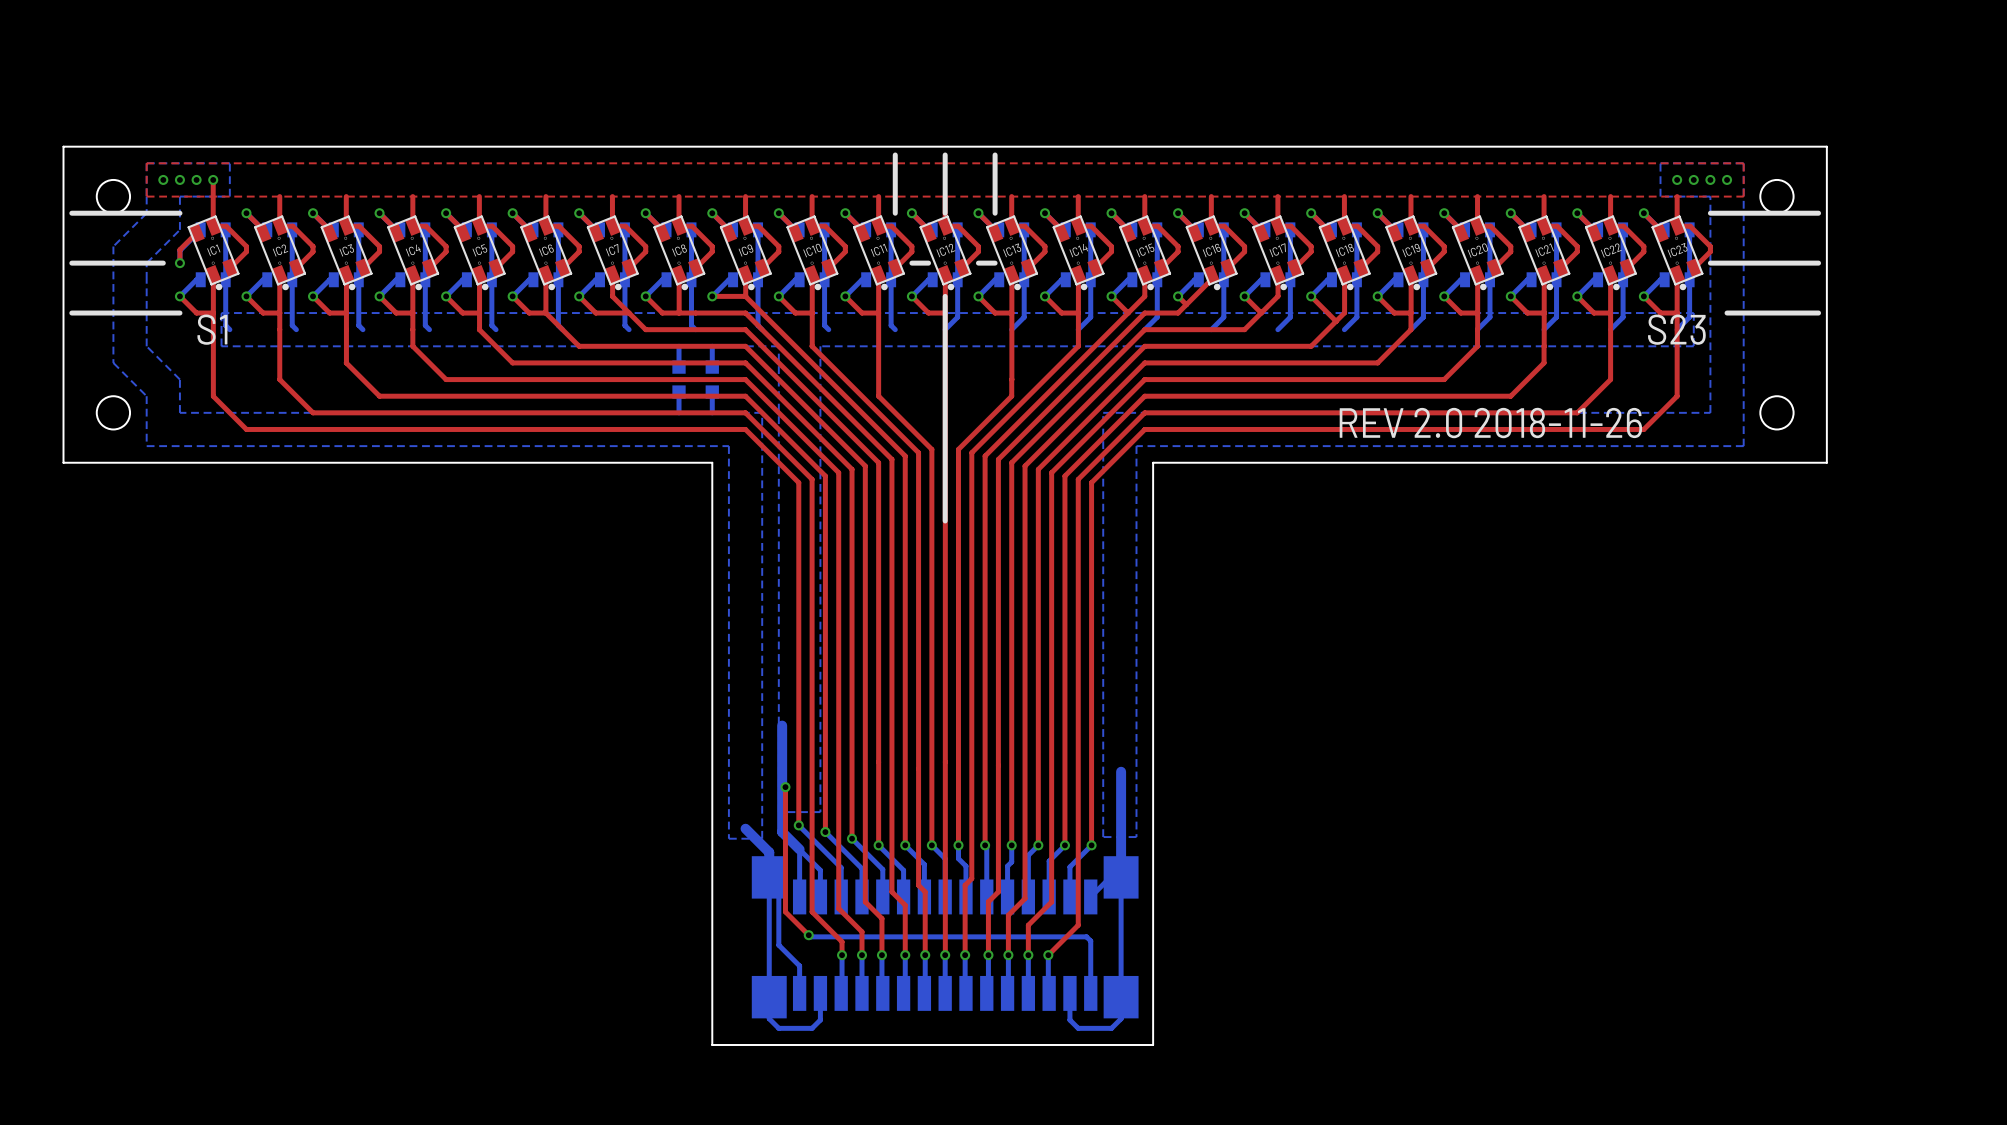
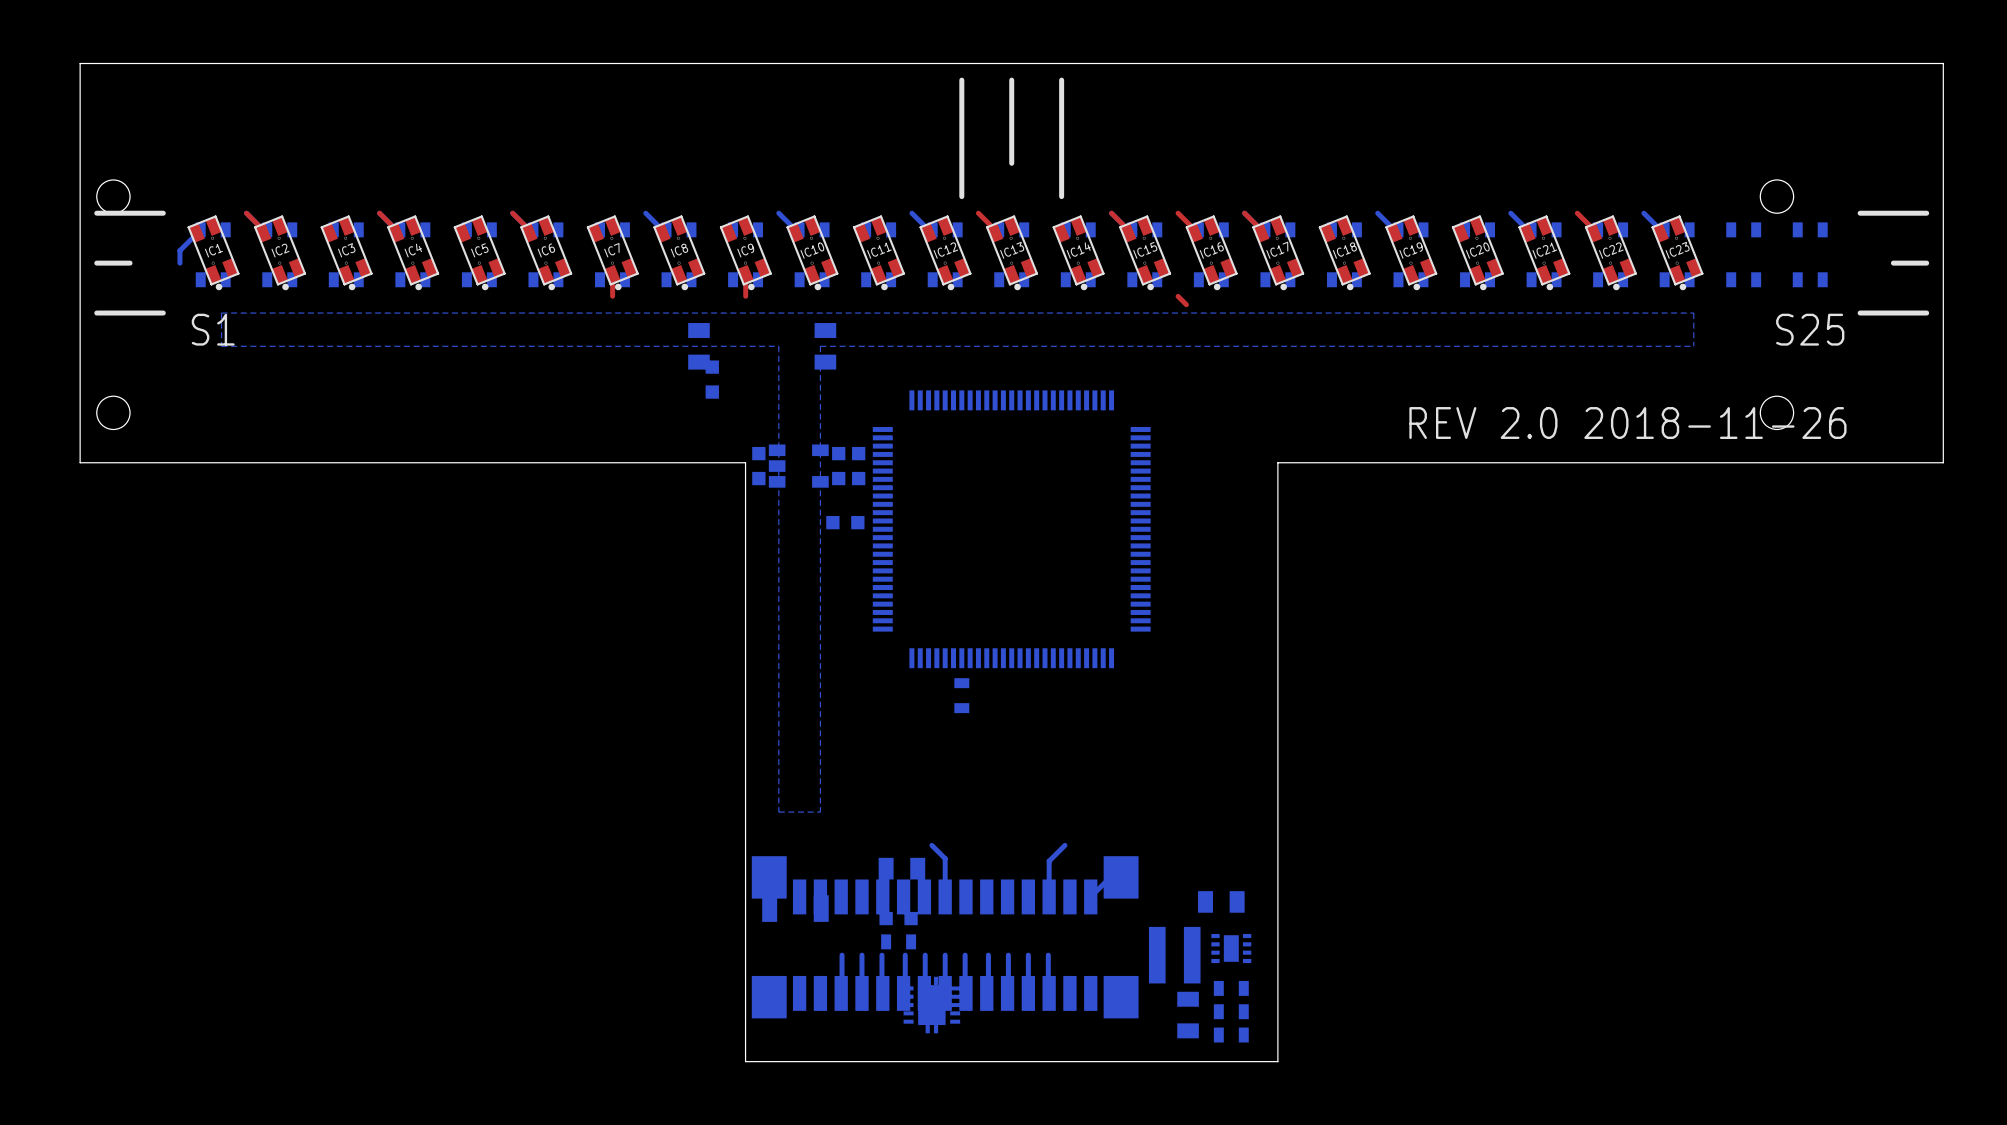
line: none -> (961, 80) (961, 196)
line: none -> (1011, 80) (1011, 163)
line: none -> (1061, 80) (1061, 196)
line: (895, 154) (895, 213) -> none
line: (945, 154) (945, 213) -> none
line: (995, 154) (995, 213) -> none
top zone outline: (146, 163) (1743, 163) (1743, 196) (146, 196) (146, 163) -> none
bottom zone outline: (146, 163) (229, 163) (229, 196) (179, 196) (179, 229) (146, 263) (146, 346) (179, 379) (179, 412) (762, 412) (762, 838) (728, 838) (728, 446) (146, 446) (146, 396) (113, 362) (113, 246) (146, 213) (146, 163) -> none
bottom zone outline: (1660, 163) (1660, 196) (1710, 196) (1710, 412) (1103, 412) (1103, 837) (1136, 837) (1136, 446) (1743, 446) (1743, 163) (1660, 163) -> none
via: (163, 179) -> none
via: (179, 179) -> none
via: (196, 179) -> none
top track: (213, 179) (213, 225) (226, 226) (246, 246) (246, 251) (230, 267) -> none
via: (213, 179) -> none
via: (1677, 179) -> none
via: (1693, 179) -> none
via: (1710, 179) -> none
via: (1727, 179) -> none
top track: (279, 196) (279, 225) (292, 226) (313, 246) (313, 251) (296, 267) -> none
top track: (346, 196) (346, 225) (359, 226) (379, 246) (379, 251) (363, 267) -> none
top track: (412, 196) (412, 225) (425, 226) (446, 246) (446, 251) (429, 267) -> none
top track: (479, 196) (479, 225) (492, 226) (512, 246) (512, 251) (496, 267) -> none
top track: (545, 196) (545, 225) (558, 226) (579, 246) (579, 251) (563, 267) -> none
top track: (612, 196) (612, 225) (625, 226) (645, 246) (645, 251) (629, 267) -> none
top track: (679, 196) (679, 225) (692, 226) (712, 246) (712, 251) (696, 267) -> none
top track: (745, 196) (745, 225) (758, 226) (778, 246) (778, 251) (762, 267) -> none
top track: (812, 196) (812, 225) (825, 226) (845, 246) (845, 251) (829, 267) -> none
top track: (878, 196) (878, 225) (891, 226) (911, 246) (911, 251) (895, 267) -> none
top track: (945, 196) (945, 225) (958, 226) (978, 246) (978, 251) (962, 267) -> none
top track: (1011, 196) (1011, 225) (1024, 226) (1044, 246) (1044, 251) (1028, 267) -> none
top track: (1078, 196) (1078, 225) (1091, 226) (1111, 246) (1111, 251) (1095, 267) -> none
top track: (1144, 196) (1144, 225) (1157, 226) (1178, 246) (1178, 251) (1161, 267) -> none
top track: (1211, 196) (1211, 225) (1224, 226) (1244, 246) (1244, 251) (1228, 267) -> none
top track: (1277, 196) (1277, 225) (1290, 226) (1311, 246) (1311, 251) (1295, 267) -> none
top track: (1344, 196) (1344, 225) (1357, 226) (1377, 246) (1377, 251) (1361, 267) -> none
top track: (1410, 196) (1410, 225) (1423, 226) (1444, 246) (1444, 251) (1428, 267) -> none
top track: (1477, 196) (1477, 225) (1490, 226) (1510, 246) (1510, 251) (1494, 267) -> none
top track: (1544, 196) (1544, 225) (1557, 226) (1577, 246) (1577, 251) (1561, 267) -> none
top track: (1610, 196) (1610, 225) (1623, 226) (1643, 246) (1643, 251) (1627, 267) -> none
top track: (1677, 196) (1677, 225) (1690, 226) (1710, 246) (1710, 251) (1694, 267) -> none
line: (71, 213) (96, 213) -> none
line: (163, 213) (179, 213) -> none
via: (246, 213) -> none
top track: (313, 213) (329, 229) (329, 233) -> none
via: (313, 213) -> none
via: (379, 213) -> none
top track: (446, 213) (462, 229) (462, 233) -> none
via: (446, 213) -> none
via: (512, 213) -> none
top track: (579, 213) (595, 229) (595, 233) -> none
via: (579, 213) -> none
top track: (645, 213) (662, 229) (662, 233) -> none
via: (645, 213) -> none
top track: (712, 213) (729, 229) (729, 233) -> none
via: (712, 213) -> none
top track: (778, 213) (795, 229) (795, 233) -> none
via: (778, 213) -> none
top track: (845, 213) (862, 229) (862, 233) -> none
via: (845, 213) -> none
top track: (911, 213) (928, 229) (928, 233) -> none
via: (911, 213) -> none
via: (978, 213) -> none
top track: (1044, 213) (1061, 229) (1061, 233) -> none
via: (1044, 213) -> none
via: (1111, 213) -> none
via: (1178, 213) -> none
via: (1244, 213) -> none
top track: (1311, 213) (1327, 229) (1327, 233) -> none
via: (1311, 213) -> none
top track: (1377, 213) (1394, 229) (1394, 233) -> none
via: (1377, 213) -> none
top track: (1444, 213) (1460, 229) (1460, 233) -> none
via: (1444, 213) -> none
top track: (1510, 213) (1527, 229) (1527, 233) -> none
via: (1510, 213) -> none
via: (1577, 213) -> none
top track: (1643, 213) (1660, 229) (1660, 233) -> none
via: (1643, 213) -> none
line: (1710, 213) (1818, 213) -> none
line: none -> (1860, 213) (1926, 213)
bottom track: (225, 229) (225, 325) (229, 329) -> none
bottom track: (292, 229) (292, 325) (296, 329) -> none
bottom track: (358, 229) (358, 325) (362, 329) -> none
bottom track: (425, 229) (425, 325) (429, 329) -> none
bottom track: (491, 229) (491, 325) (496, 329) -> none
bottom track: (558, 229) (558, 325) (562, 329) -> none
bottom track: (624, 229) (624, 325) (629, 329) -> none
bottom track: (691, 229) (691, 325) (695, 329) -> none
bottom track: (758, 229) (758, 325) (762, 329) -> none
bottom track: (824, 229) (824, 325) (828, 329) -> none
bottom track: (891, 229) (891, 325) (895, 329) -> none
bottom track: (957, 229) (957, 317) (945, 329) -> none
bottom track: (1024, 229) (1024, 317) (1011, 329) -> none
bottom track: (1090, 229) (1090, 317) (1078, 329) -> none
bottom track: (1157, 229) (1157, 317) (1144, 329) -> none
bottom track: (1223, 229) (1223, 317) (1211, 329) -> none
bottom track: (1290, 229) (1290, 317) (1277, 329) -> none
bottom track: (1356, 229) (1356, 317) (1344, 329) -> none
bottom track: (1423, 229) (1423, 317) (1410, 329) -> none
bottom track: (1489, 229) (1489, 317) (1477, 329) -> none
bottom track: (1556, 229) (1556, 317) (1544, 329) -> none
bottom track: (1623, 229) (1623, 317) (1610, 329) -> none
bottom track: (1689, 229) (1689, 317) (1677, 329) -> none
part: none -> (1743, 229)
part: none -> (1810, 229)
top track: (196, 233) (179, 249) (179, 263) -> none
line: (71, 263) (96, 263) -> none
line: (130, 263) (163, 263) -> none
via: (179, 263) -> none
line: (911, 263) (928, 263) -> none
line: (978, 263) (995, 263) -> none
line: (1710, 263) (1818, 263) -> none
line: none -> (1893, 263) (1926, 263)
top track: (213, 274) (213, 396) (246, 429) (745, 429) (798, 482) (798, 825) -> none
top track: (279, 274) (279, 379) (313, 412) (745, 412) (812, 479) (812, 911) (842, 941) (842, 955) -> none
top track: (346, 274) (346, 362) -> none
top track: (412, 274) (412, 346) (446, 379) (745, 379) (838, 472) (838, 908) (862, 931) (862, 955) -> none
top track: (479, 274) (479, 329) -> none
top track: (545, 274) (545, 313) -> none
top track: (679, 274) (679, 312) -> none
top track: (812, 274) (812, 346) -> none
top track: (878, 274) (878, 396) (931, 449) (931, 845) -> none
top track: (945, 274) (945, 955) -> none
top track: (1011, 274) (1011, 379) -> none
top track: (1078, 274) (1078, 346) (971, 452) (971, 878) (965, 885) (965, 955) -> none
top track: (1144, 274) (1144, 296) (985, 456) (985, 845) -> none
top track: (1211, 274) (1211, 279) (1178, 313) (1144, 313) (998, 459) (998, 891) (988, 901) (988, 955) -> none
top track: (1278, 274) (1278, 296) (1244, 329) (1144, 329) (1011, 462) (1011, 845) -> none
top track: (1344, 274) (1344, 312) (1311, 346) (1144, 346) (1025, 466) (1025, 898) (1008, 915) (1008, 955) -> none
top track: (1411, 274) (1411, 312) -> none
top track: (1477, 274) (1477, 329) -> none
top track: (1544, 274) (1544, 346) -> none
top track: (1610, 274) (1610, 379) (1577, 412) (1144, 412) (1078, 479) (1078, 925) (1048, 955) -> none
top track: (1677, 274) (1677, 396) (1643, 429) (1144, 429) (1091, 482) (1091, 845) -> none
bottom track: (200, 279) (196, 279) (179, 296) -> none
bottom track: (267, 279) (263, 279) (246, 296) -> none
bottom track: (333, 279) (329, 279) (313, 296) -> none
bottom track: (400, 279) (396, 279) (379, 296) -> none
bottom track: (466, 279) (462, 279) (446, 296) -> none
bottom track: (533, 279) (529, 279) (512, 296) -> none
bottom track: (599, 279) (595, 279) (579, 296) -> none
bottom track: (666, 279) (662, 279) (645, 296) -> none
bottom track: (733, 279) (728, 279) (712, 296) -> none
bottom track: (799, 279) (795, 279) (778, 296) -> none
bottom track: (866, 279) (862, 279) (845, 296) -> none
bottom track: (932, 279) (928, 279) (911, 296) -> none
bottom track: (999, 279) (995, 279) (978, 296) -> none
bottom track: (1065, 279) (1061, 279) (1044, 296) -> none
bottom track: (1132, 279) (1128, 279) (1111, 296) -> none
bottom track: (1198, 279) (1194, 279) (1178, 296) -> none
bottom track: (1265, 279) (1261, 279) (1244, 296) -> none
bottom track: (1331, 279) (1327, 279) (1311, 296) -> none
bottom track: (1398, 279) (1394, 279) (1377, 296) -> none
bottom track: (1465, 279) (1460, 279) (1444, 296) -> none
bottom track: (1531, 279) (1527, 279) (1510, 296) -> none
bottom track: (1598, 279) (1593, 279) (1577, 296) -> none
bottom track: (1664, 279) (1660, 279) (1643, 296) -> none
part: none -> (1743, 279)
part: none -> (1810, 279)
top track: (179, 296) (196, 313) (213, 313) -> none
via: (179, 296) -> none
top track: (246, 296) (263, 313) (279, 313) -> none
via: (246, 296) -> none
top track: (313, 296) (329, 313) (346, 313) -> none
via: (313, 296) -> none
top track: (379, 296) (396, 313) (412, 313) -> none
via: (379, 296) -> none
top track: (446, 296) (462, 313) (479, 313) -> none
via: (446, 296) -> none
top track: (512, 296) (529, 313) (545, 313) -> none
via: (512, 296) -> none
top track: (579, 296) (595, 313) (629, 313) -> none
via: (579, 296) -> none
top track: (612, 296) (645, 329) (745, 329) (878, 462) (878, 845) -> none
top track: (645, 296) (662, 313) (745, 313) (891, 459) (891, 891) (905, 905) (905, 955) -> none
via: (645, 296) -> none
top track: (712, 296) (745, 296) (905, 456) (905, 845) -> none
via: (712, 296) -> none
top track: (778, 296) (795, 313) (812, 313) -> none
via: (778, 296) -> none
top track: (845, 296) (862, 313) (878, 313) -> none
via: (845, 296) -> none
top track: (911, 296) (928, 313) (945, 313) -> none
via: (911, 296) -> none
line: (945, 296) (945, 520) -> none
top track: (978, 296) (995, 313) (1011, 313) -> none
via: (978, 296) -> none
top track: (1044, 296) (1061, 313) (1078, 313) -> none
via: (1044, 296) -> none
top track: (1111, 296) (1128, 313) -> none
via: (1111, 296) -> none
via: (1178, 296) -> none
top track: (1244, 296) (1261, 313) -> none
via: (1244, 296) -> none
top track: (1311, 296) (1336, 321) -> none
via: (1311, 296) -> none
top track: (1377, 296) (1394, 313) (1410, 313) (1410, 329) (1377, 362) (1144, 362) (1038, 469) (1038, 845) -> none
via: (1377, 296) -> none
top track: (1444, 296) (1460, 313) (1477, 313) -> none
via: (1444, 296) -> none
top track: (1510, 296) (1527, 313) (1544, 313) -> none
via: (1510, 296) -> none
top track: (1577, 296) (1593, 313) (1610, 313) -> none
via: (1577, 296) -> none
top track: (1643, 296) (1660, 313) (1677, 313) -> none
via: (1643, 296) -> none
line: (71, 313) (96, 313) -> none
line: (163, 313) (179, 313) -> none
top track: (545, 313) (579, 346) (745, 346) (865, 466) (865, 901) (881, 918) (881, 955) -> none
line: (1727, 313) (1818, 313) -> none
line: none -> (1860, 313) (1926, 313)
top track: (479, 329) (512, 362) (745, 362) (852, 469) (852, 838) -> none
top track: (1477, 329) (1477, 346) (1444, 379) (1144, 379) (1051, 472) (1051, 901) (1028, 925) (1028, 955) -> none
text: S23 (1676, 329) -> none
text: none -> S25 (1810, 329)
bottom track: (679, 346) (679, 367) -> none
part: none -> (698, 346)
bottom track: (712, 346) (712, 367) -> none
top track: (812, 346) (918, 452) (918, 885) (925, 891) (925, 955) -> none
part: none -> (825, 346)
top track: (1544, 346) (1544, 362) (1510, 396) (1144, 396) (1064, 476) (1064, 845) -> none
top track: (346, 362) (379, 396) (745, 396) (825, 476) (825, 832) -> none
part: (679, 379) -> none
top track: (1011, 379) (1011, 396) (958, 449) (958, 845) -> none
bottom track: (679, 392) (679, 412) -> none
bottom track: (712, 392) (712, 412) -> none
text position: REV 2.0 2018-11-26 (1490, 423) -> REV 2.0 2018-11-26 (1627, 423)
board edge: (80, 462) (63, 462) (63, 146) (1826, 146) (1826, 462) -> (80, 462) (80, 63) (1943, 63) (1943, 462) (1826, 462)
board edge: (712, 462) (712, 1044) (1153, 1044) (1153, 462) (1277, 462) -> (712, 462) (745, 462) (745, 1061) (1277, 1061) (1277, 462)
part: none -> (758, 466)
part: none -> (798, 466)
part: none -> (838, 466)
part: none -> (858, 466)
part: none -> (845, 522)
part: none -> (1011, 529)
part: none -> (961, 695)
bottom track: (782, 725) (782, 832) (799, 849) -> none
bottom track: (1121, 771) (1121, 1018) (1111, 1028) (1078, 1028) (1069, 1020) (1069, 993) -> none
top track: (785, 787) (785, 911) (808, 935) -> none
via: (785, 787) -> none
bottom track: (798, 825) (841, 867) (841, 896) -> none
via: (798, 825) -> none
bottom track: (745, 828) (769, 852) (769, 877) -> none
bottom track: (825, 832) (862, 868) (862, 896) -> none
via: (825, 832) -> none
bottom track: (852, 838) (882, 869) (882, 896) -> none
via: (852, 838) -> none
bottom track: (878, 845) (903, 870) (903, 896) -> none
via: (878, 845) -> none
bottom track: (905, 845) (924, 864) (924, 896) -> none
via: (905, 845) -> none
via: (931, 845) -> none
bottom track: (958, 845) (958, 858) (965, 866) (965, 896) -> none
via: (958, 845) -> none
bottom track: (985, 845) (986, 847) (986, 896) -> none
via: (985, 845) -> none
bottom track: (1011, 845) (1011, 862) (1007, 866) (1007, 896) -> none
via: (1011, 845) -> none
bottom track: (1038, 845) (1028, 855) (1028, 896) -> none
via: (1038, 845) -> none
via: (1064, 845) -> none
bottom track: (1091, 845) (1069, 866) (1069, 896) -> none
via: (1091, 845) -> none
bottom track: (799, 849) (799, 896) -> none
bottom track: (799, 849) (820, 870) (820, 896) -> none
part: none -> (901, 868)
bottom track: (769, 877) (769, 1018) (778, 1028) (812, 1028) (820, 1020) (820, 993) -> none
bottom track: (769, 877) (778, 886) (778, 945) (799, 965) (799, 993) -> none
part: none -> (1221, 901)
part: none -> (795, 908)
part: none -> (898, 918)
bottom track: (808, 935) (810, 936) (1086, 936) (1090, 941) (1090, 993) -> none
via: (808, 935) -> none
part: none -> (898, 941)
part: none -> (1231, 948)
via: (842, 955) -> none
via: (862, 955) -> none
via: (881, 955) -> none
via: (905, 955) -> none
via: (925, 955) -> none
via: (945, 955) -> none
via: (965, 955) -> none
via: (988, 955) -> none
via: (1008, 955) -> none
via: (1028, 955) -> none
via: (1048, 955) -> none
part: none -> (1174, 955)
part: none -> (1231, 988)
part: none -> (931, 1005)
part: none -> (1231, 1011)
part: none -> (1188, 1015)
part: none -> (1231, 1035)

